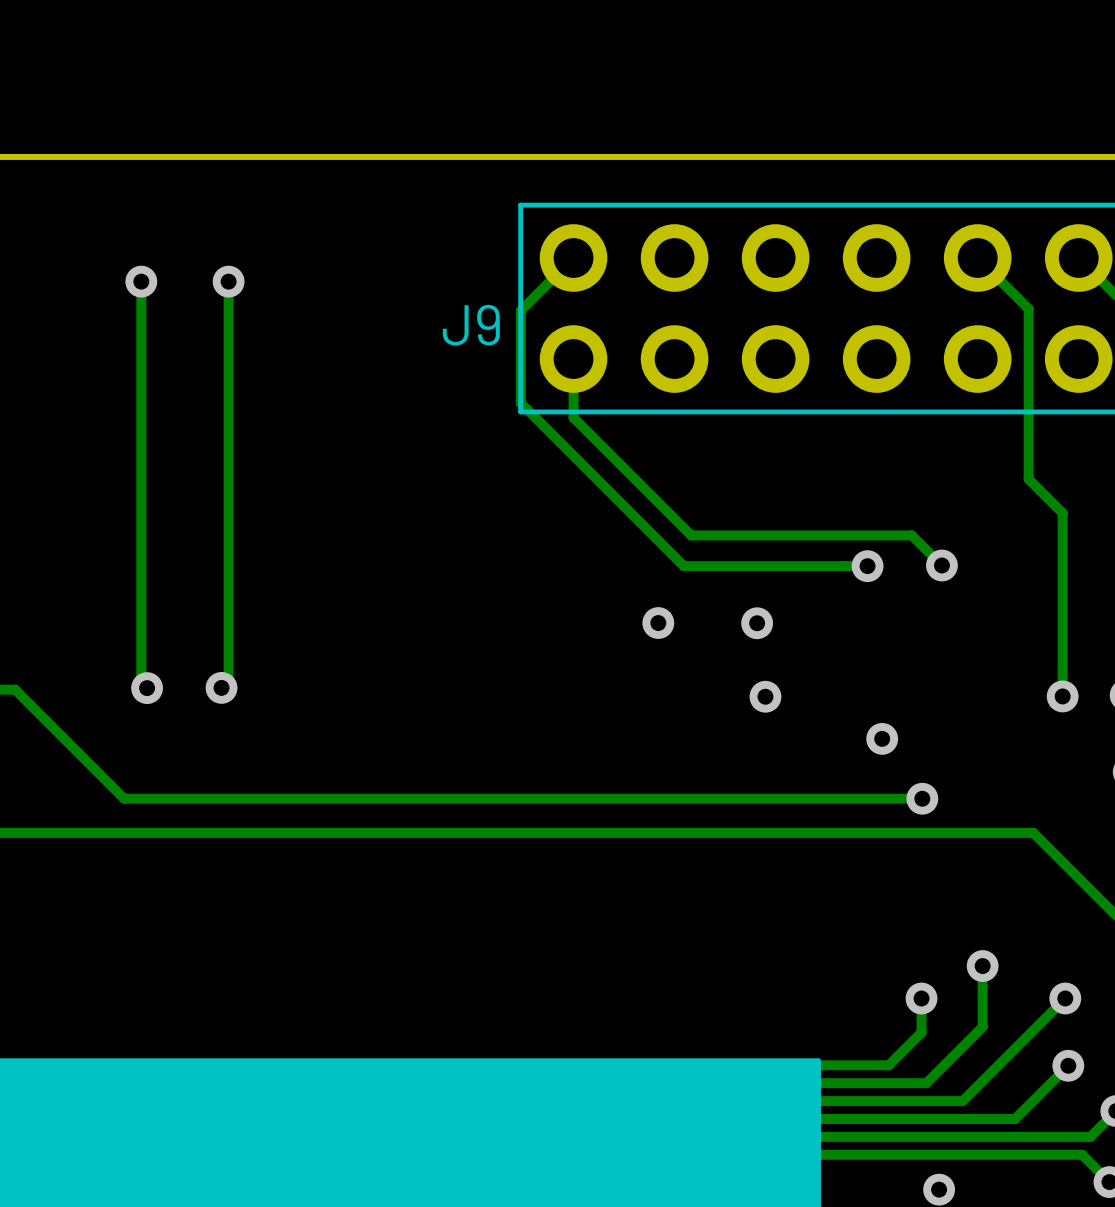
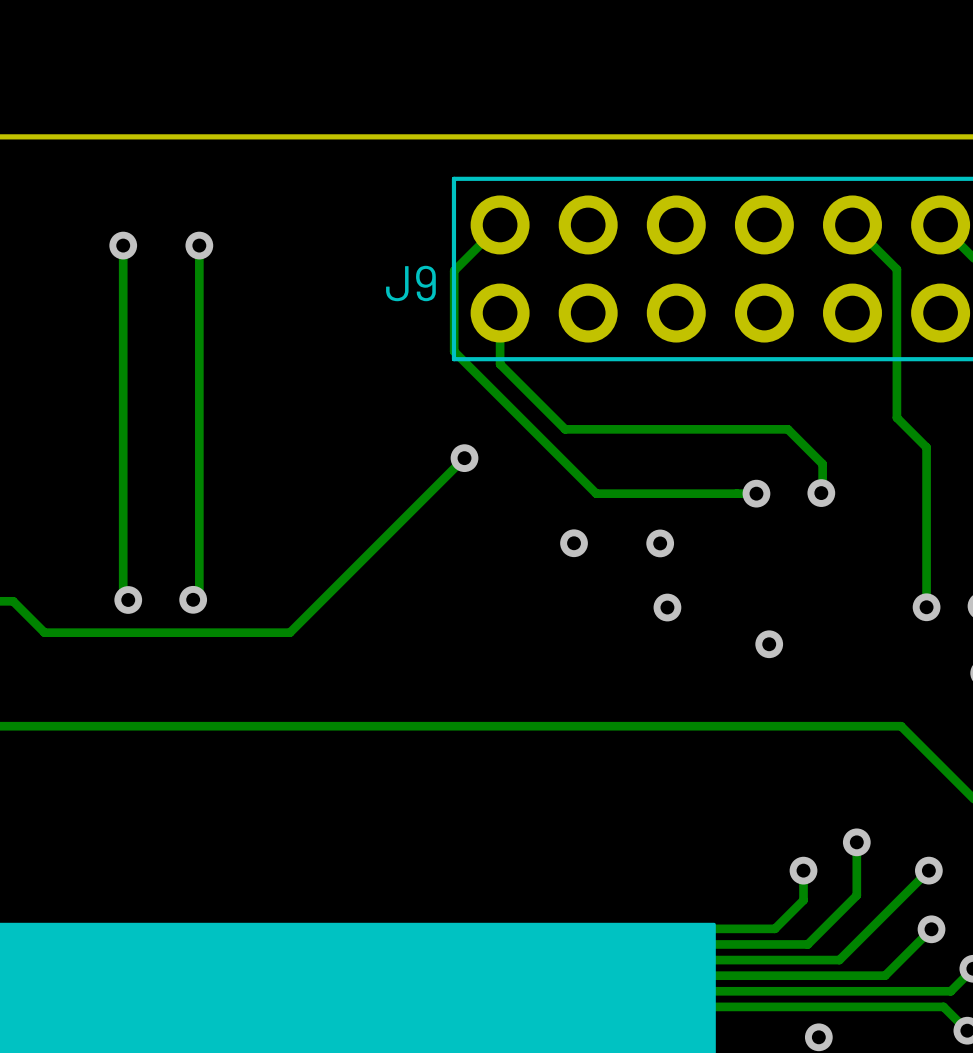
track: (648, 492) (691, 535) (911, 535) (941, 565) -> (565, 429) (787, 429) (822, 464) (821, 493)
via: none -> (464, 458)
track: (51, 725) (124, 798) (922, 798) -> (44, 632) (289, 632) (464, 458)
via: (922, 798) -> none

